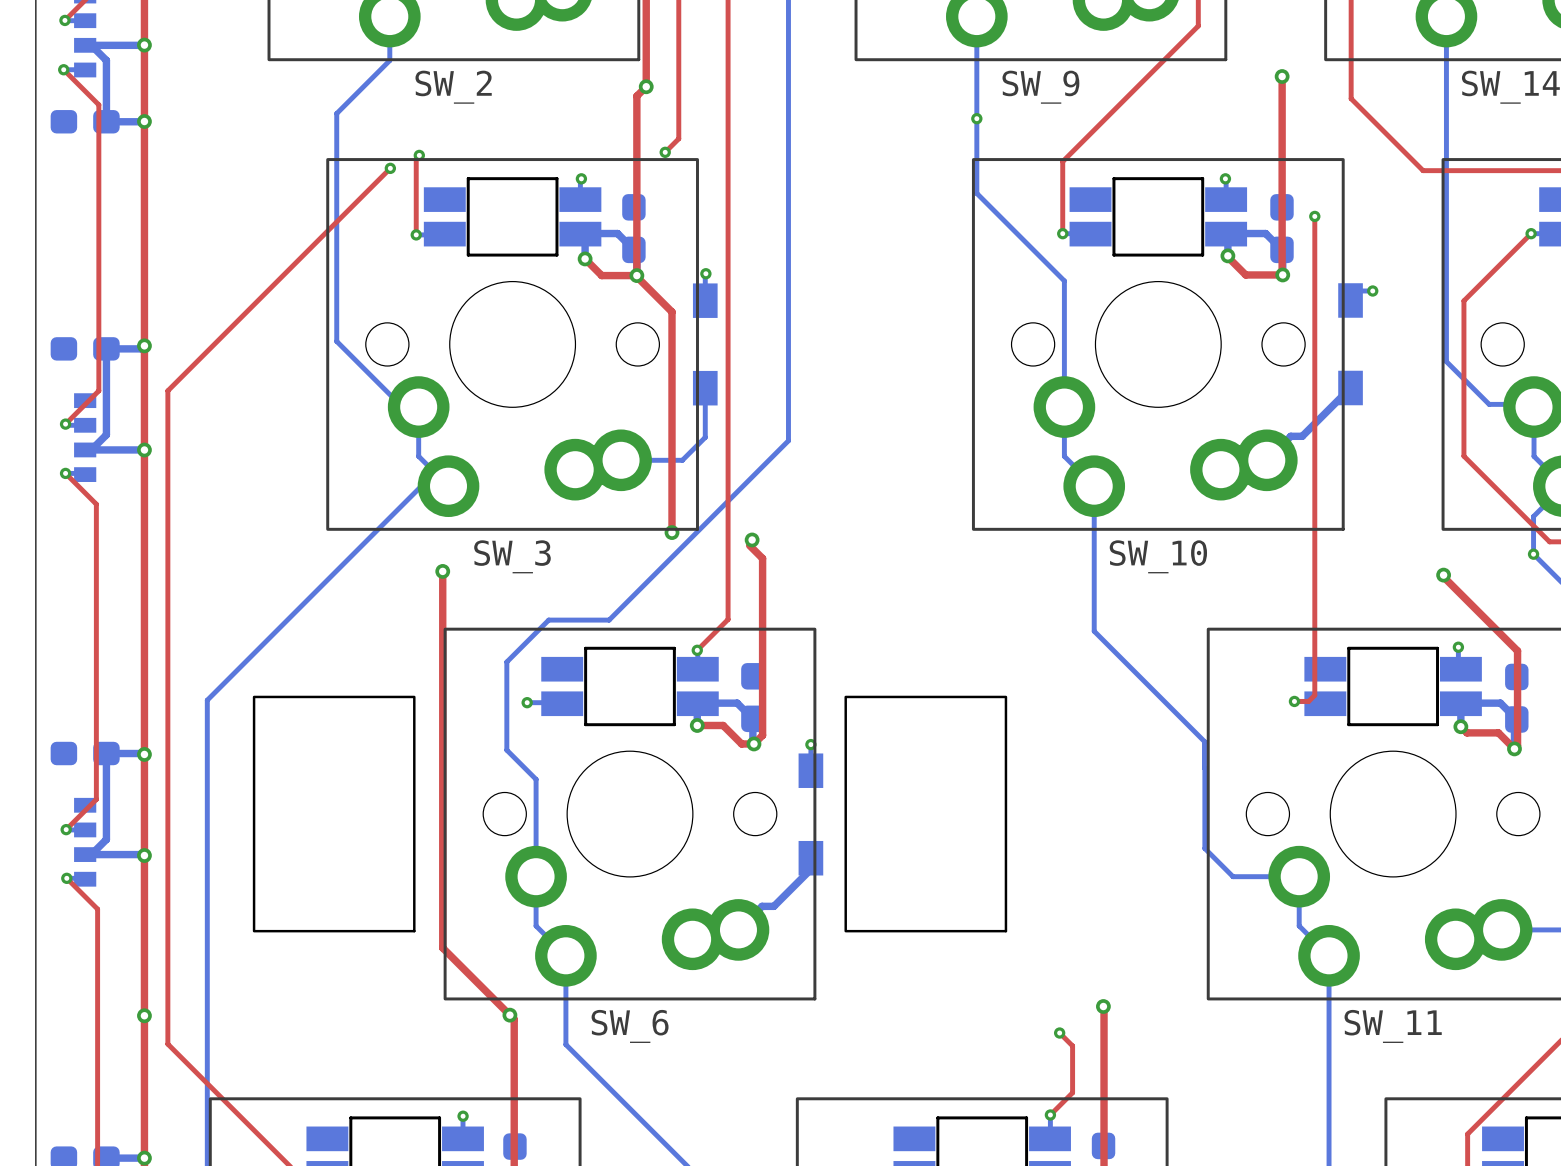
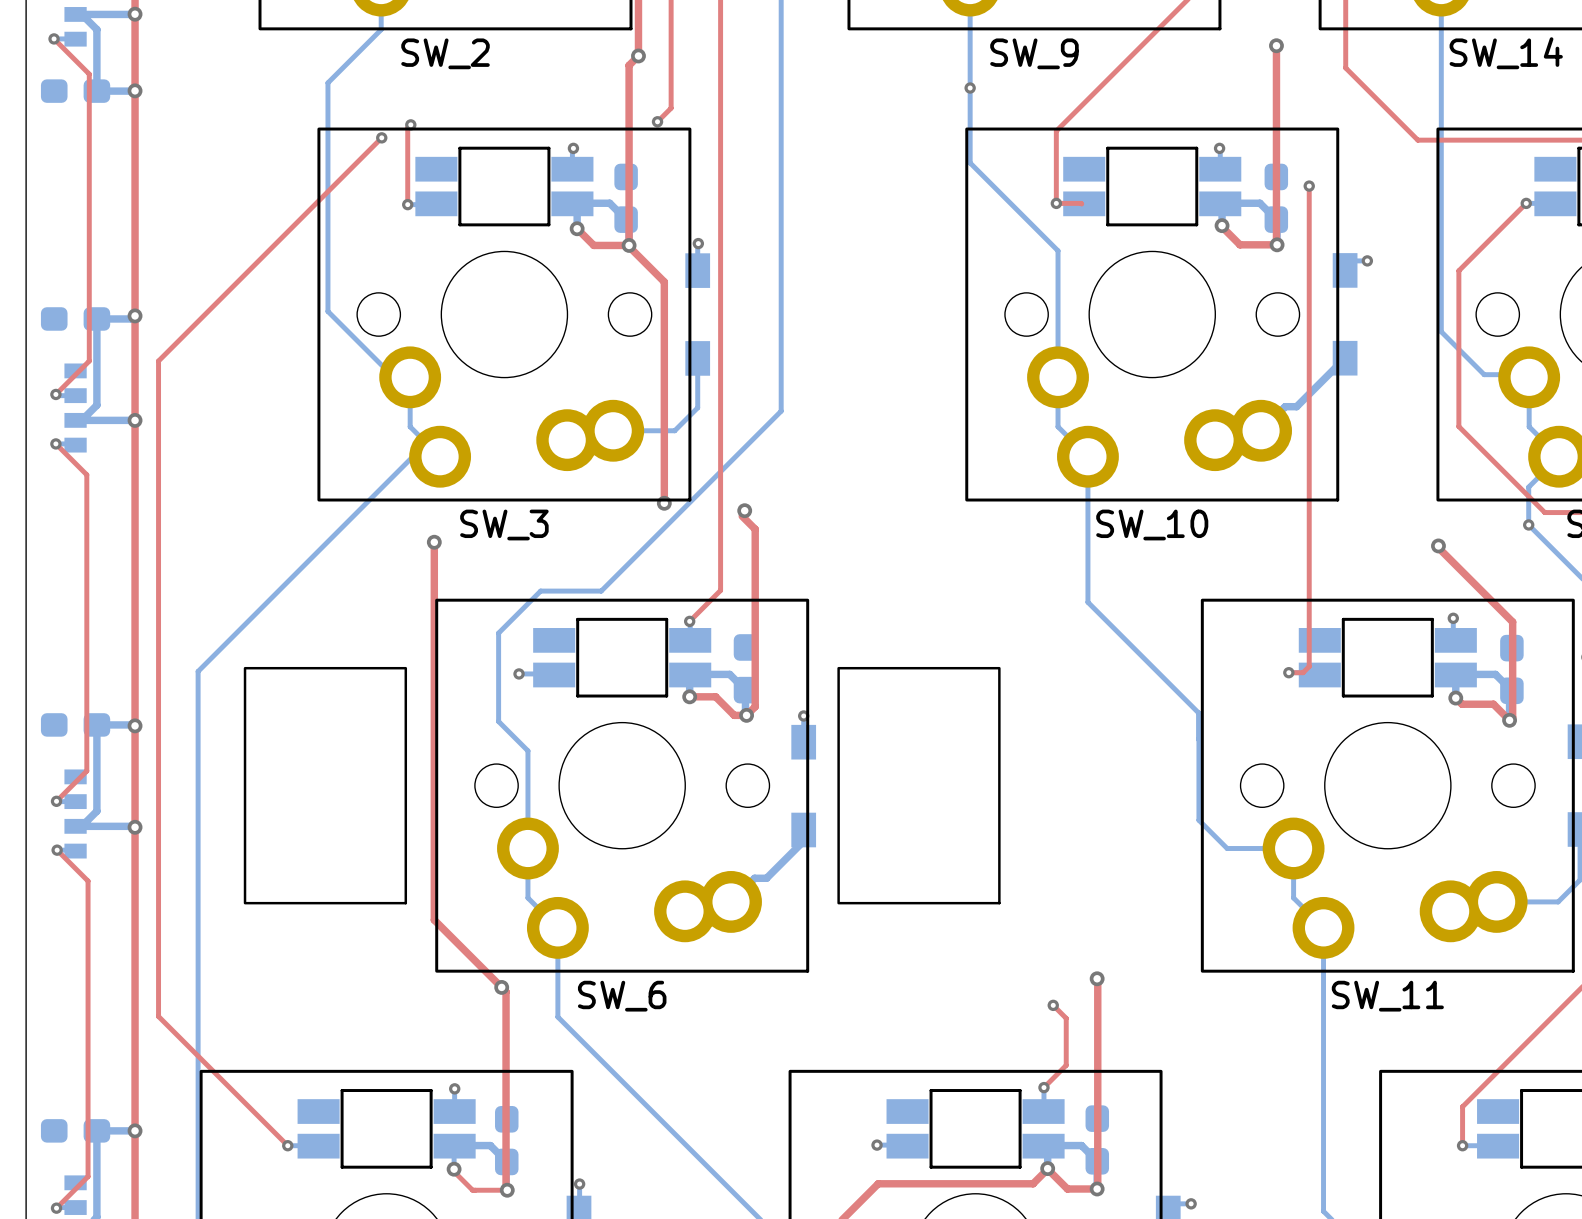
top track: none -> (1056, 203) (1081, 204)
via: (144, 1015) -> none

